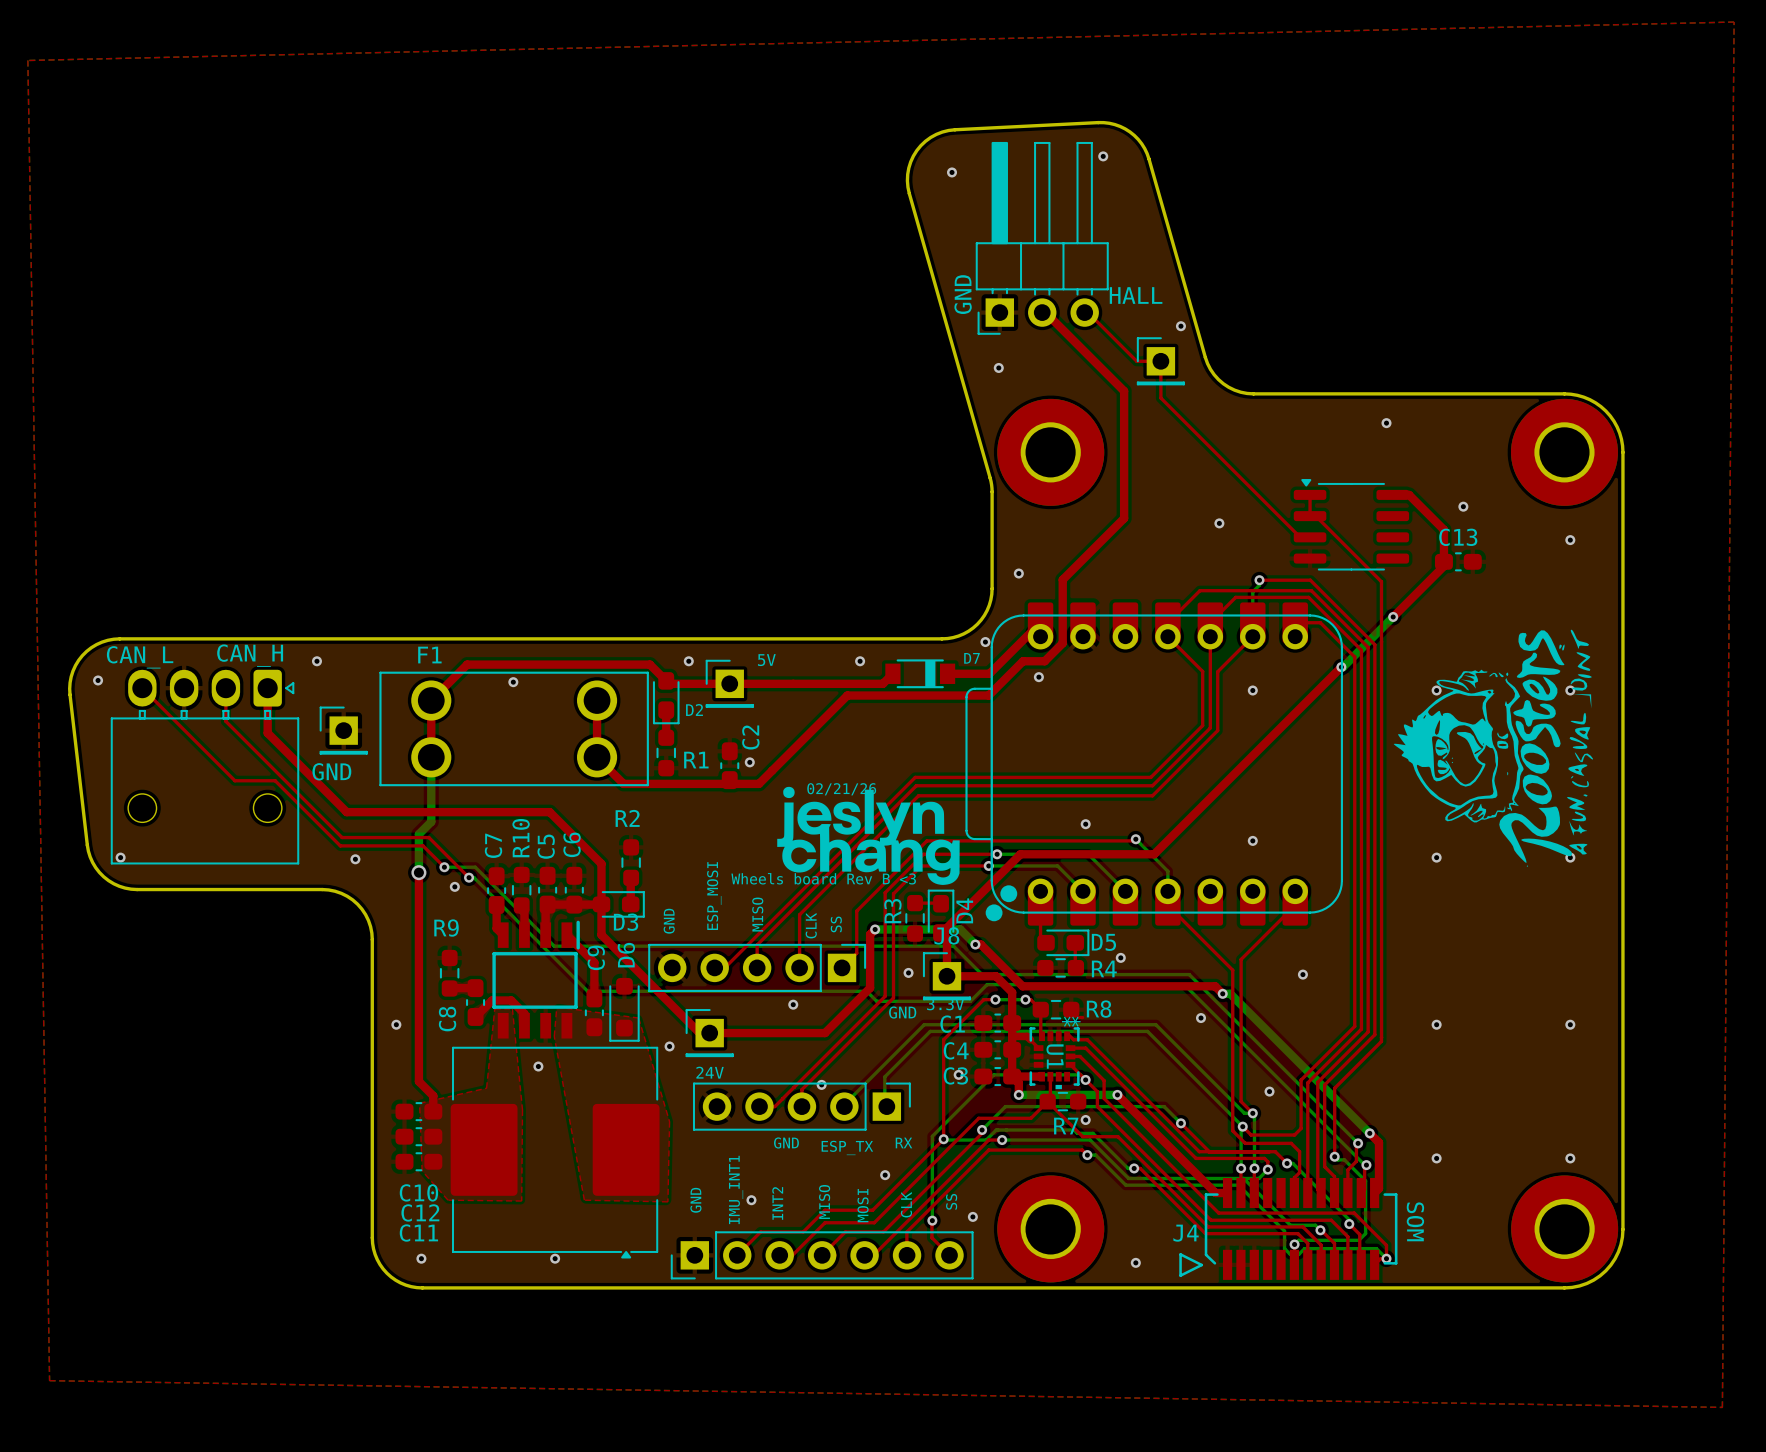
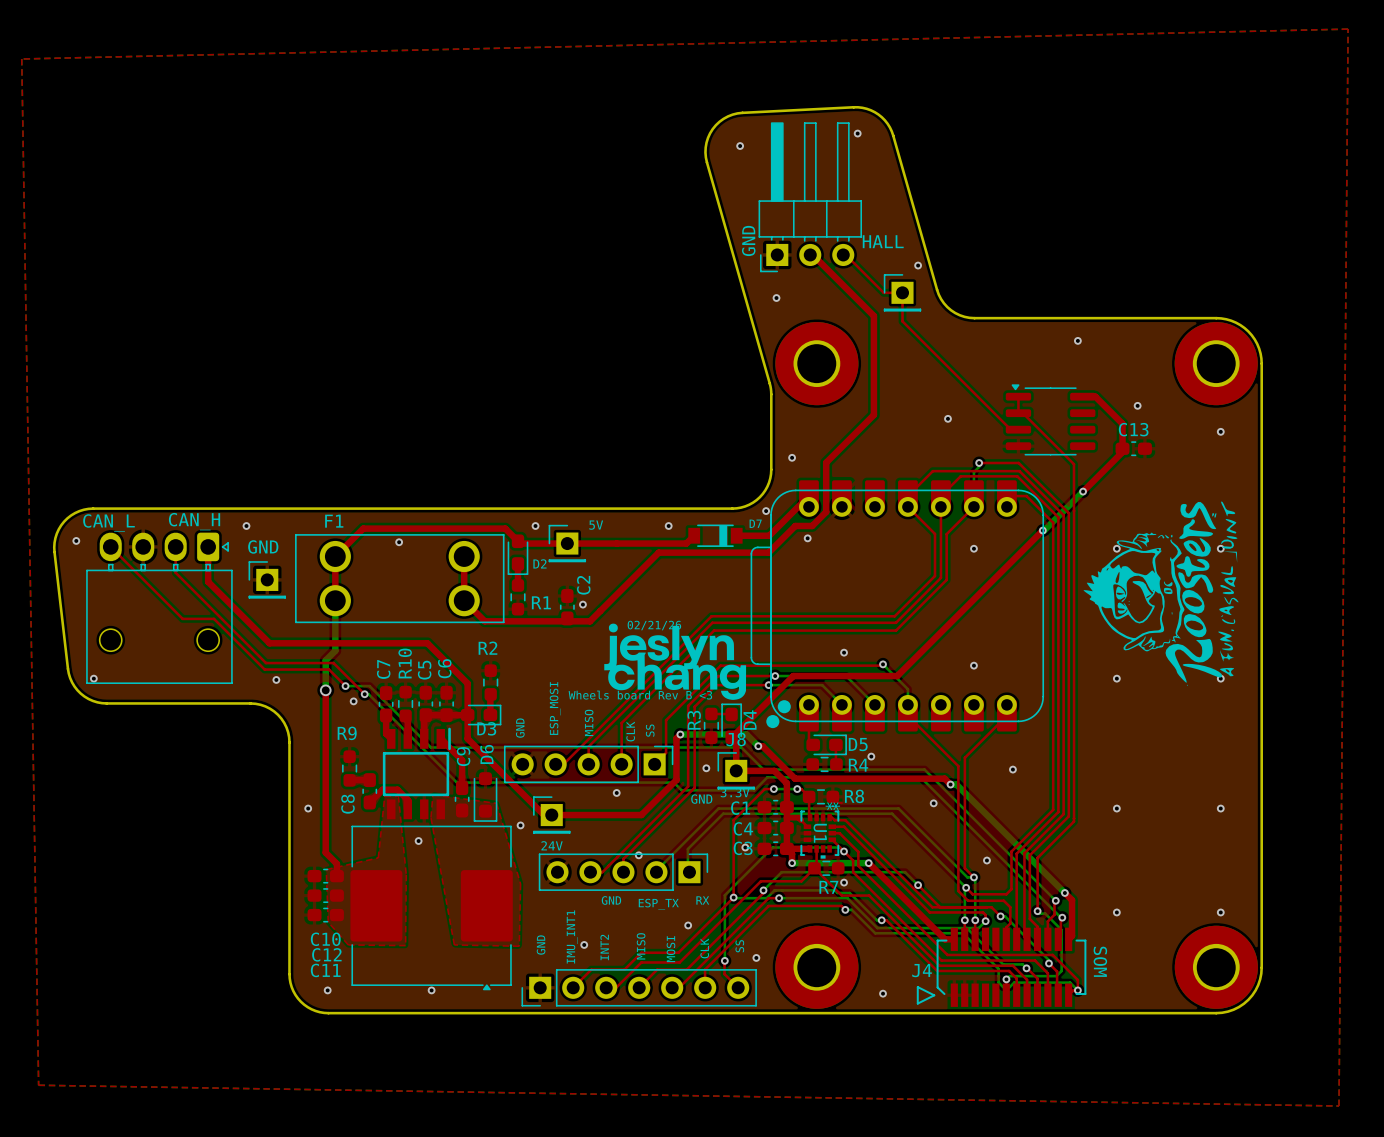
text position: GND (331, 771) -> GND (263, 546)

